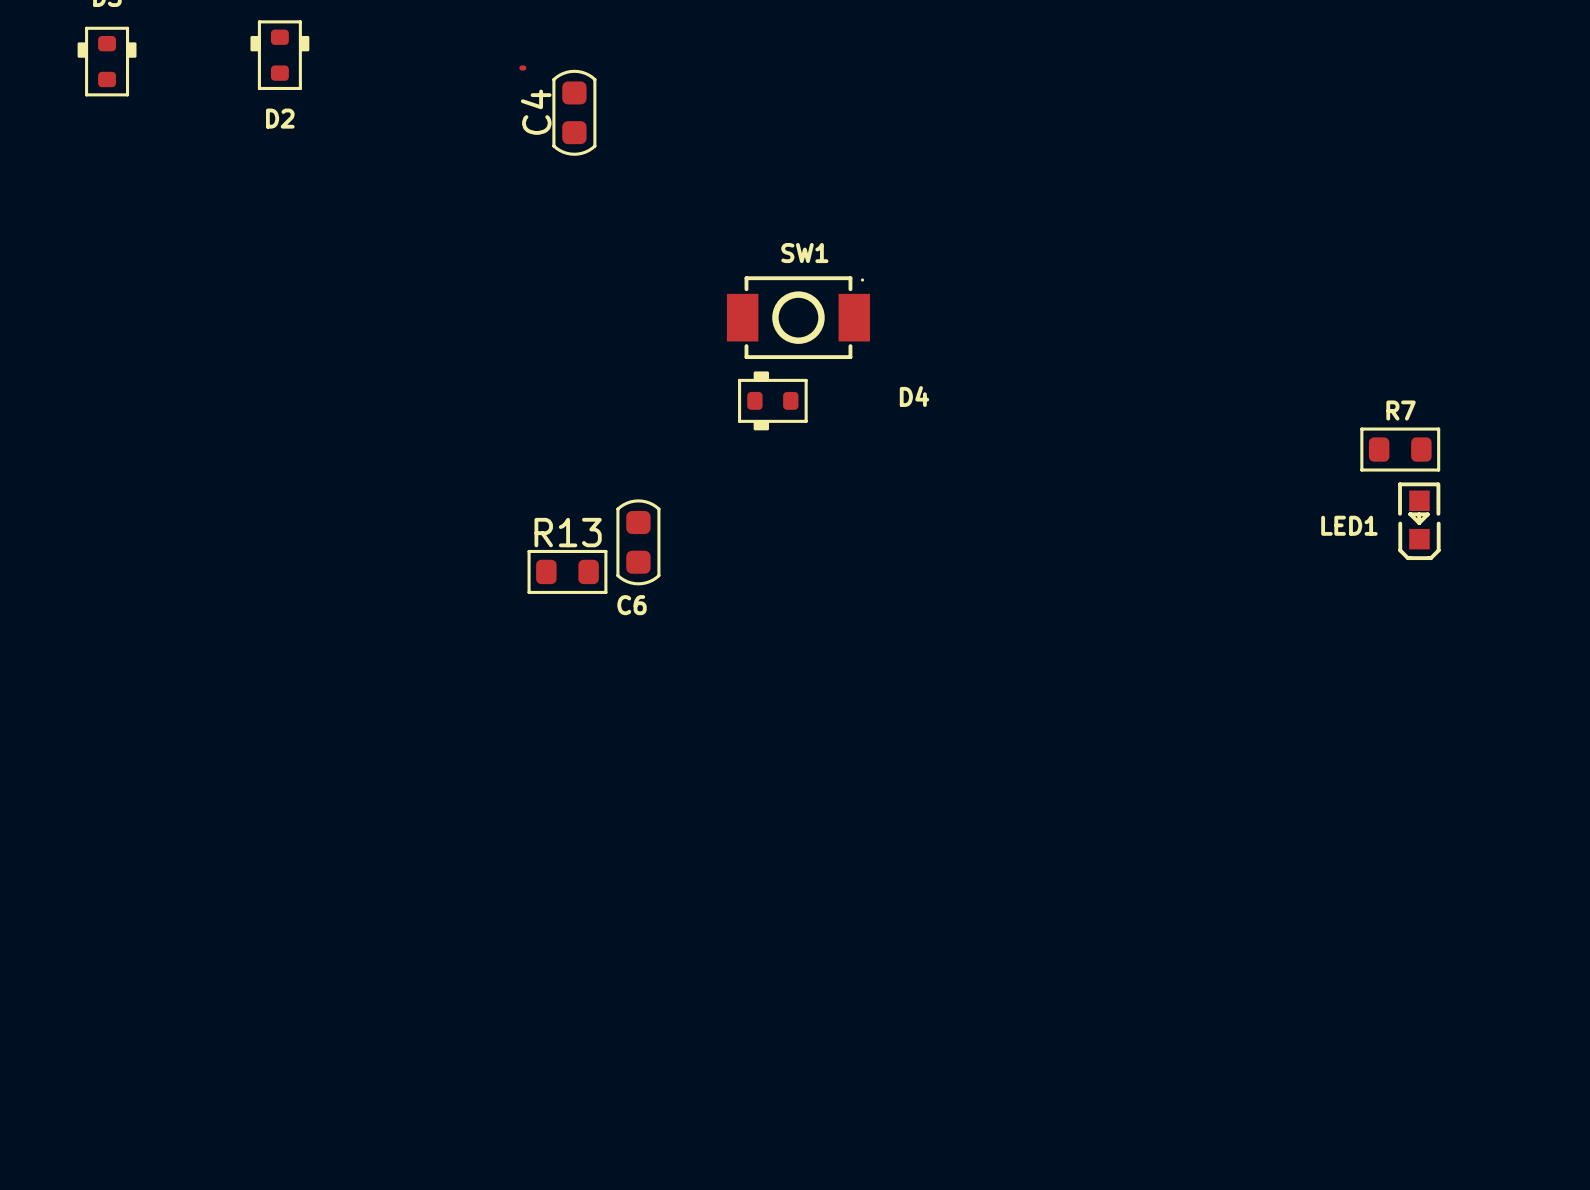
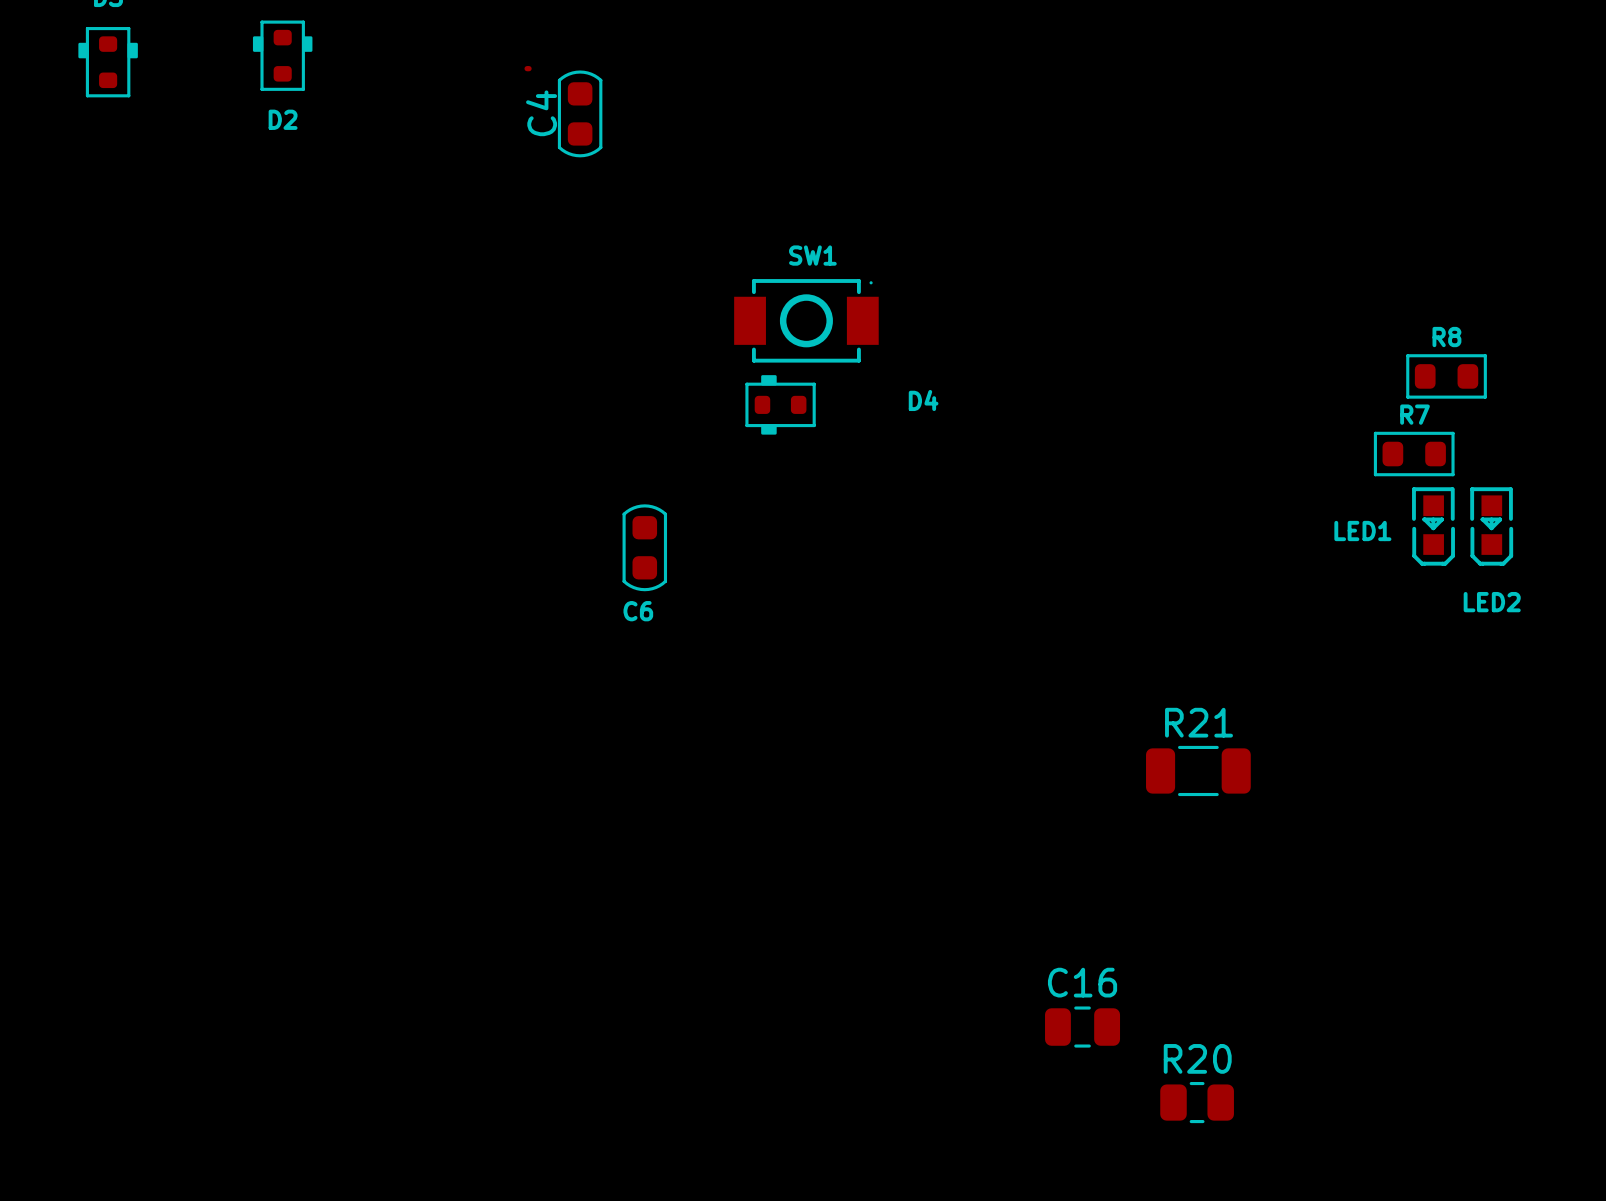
R8: none -> (1446, 376)
LED2: none -> (1491, 526)
R13: (567, 571) -> none
R21: none -> (1198, 770)
C16: none -> (1082, 1027)
R20: none -> (1197, 1102)

